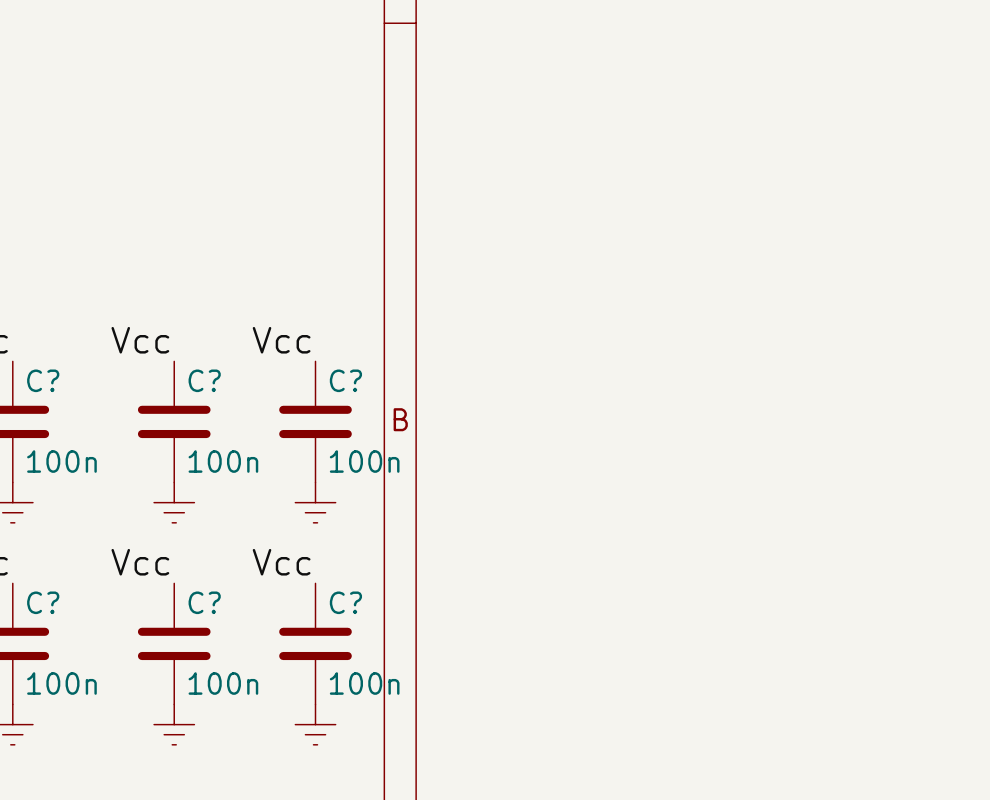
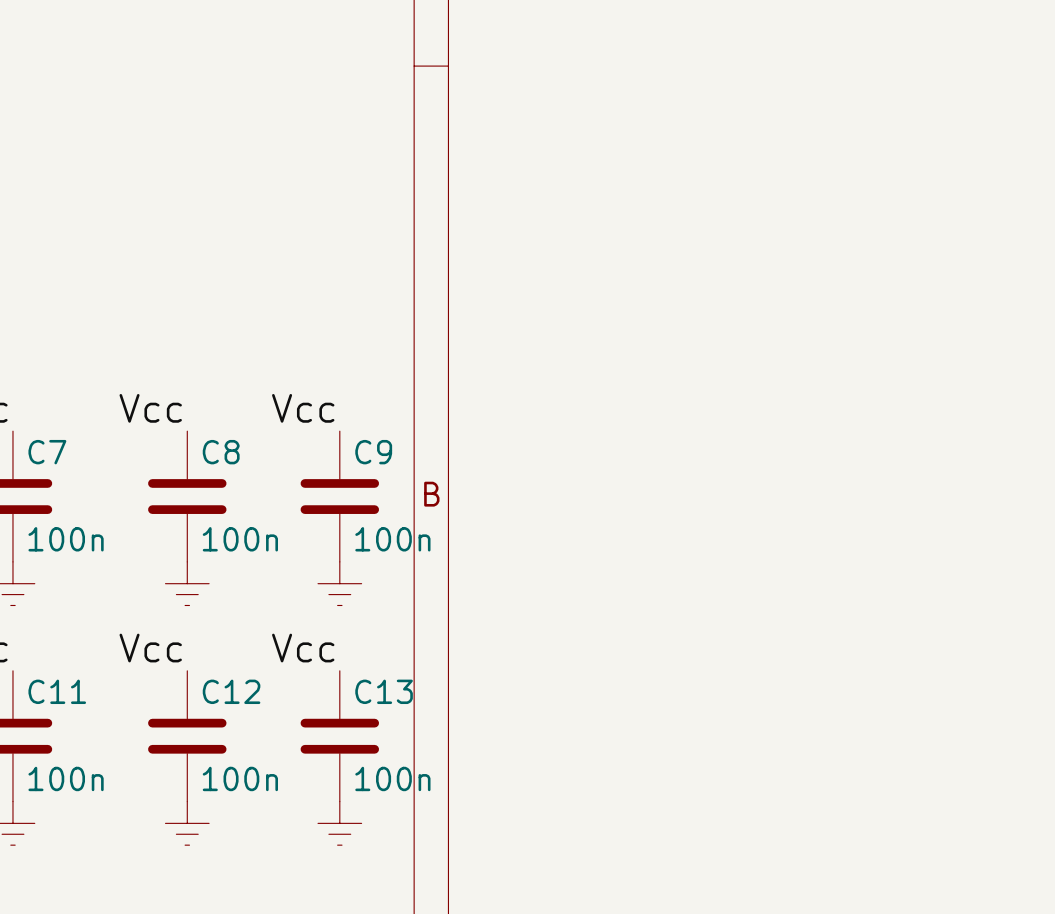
C? name: C? (43, 380) -> C7 (47, 452)
C? name: C? (204, 380) -> C8 (221, 452)
C? name: C? (345, 380) -> C9 (373, 452)
C? name: C? (43, 602) -> C11 (57, 691)
C? name: C? (204, 602) -> C12 (231, 691)
C? name: C? (345, 602) -> C13 (384, 691)

